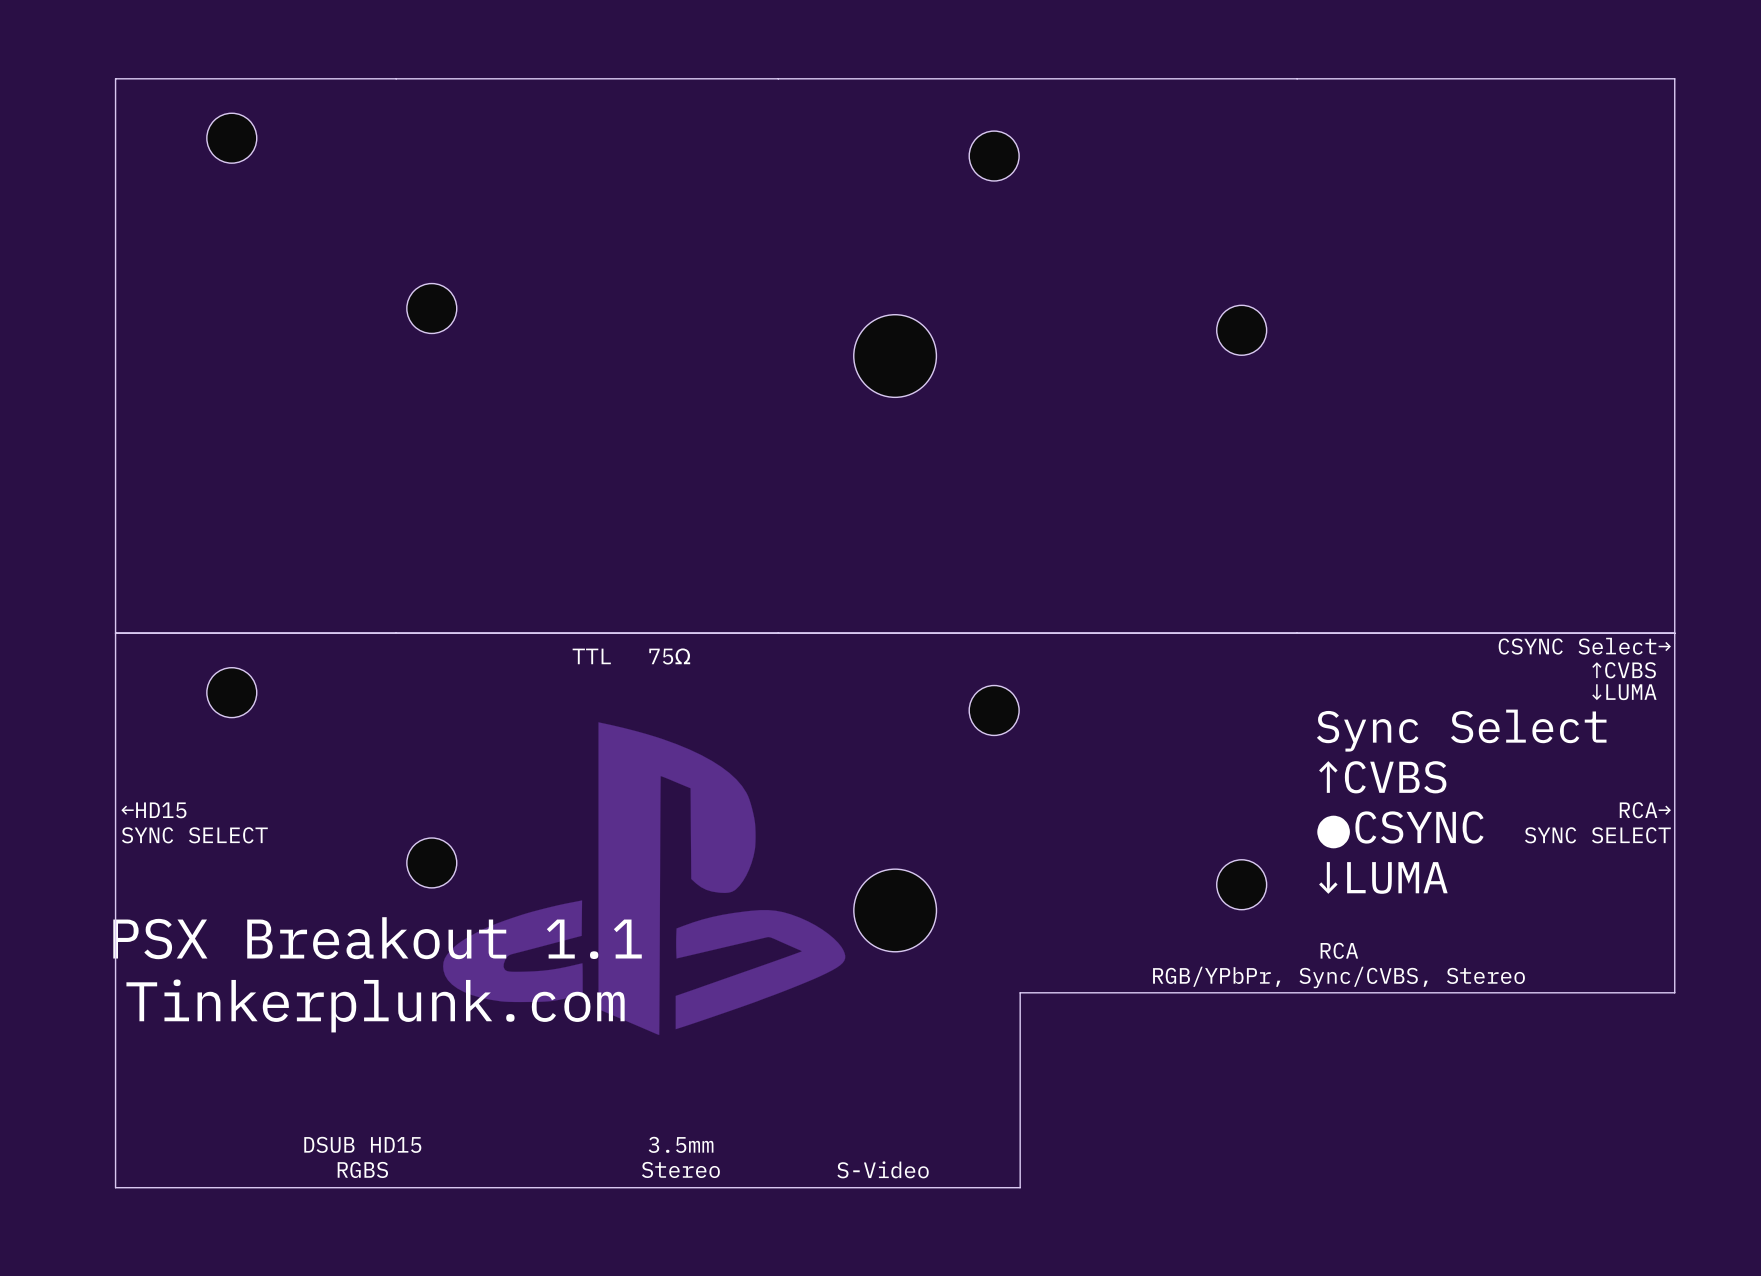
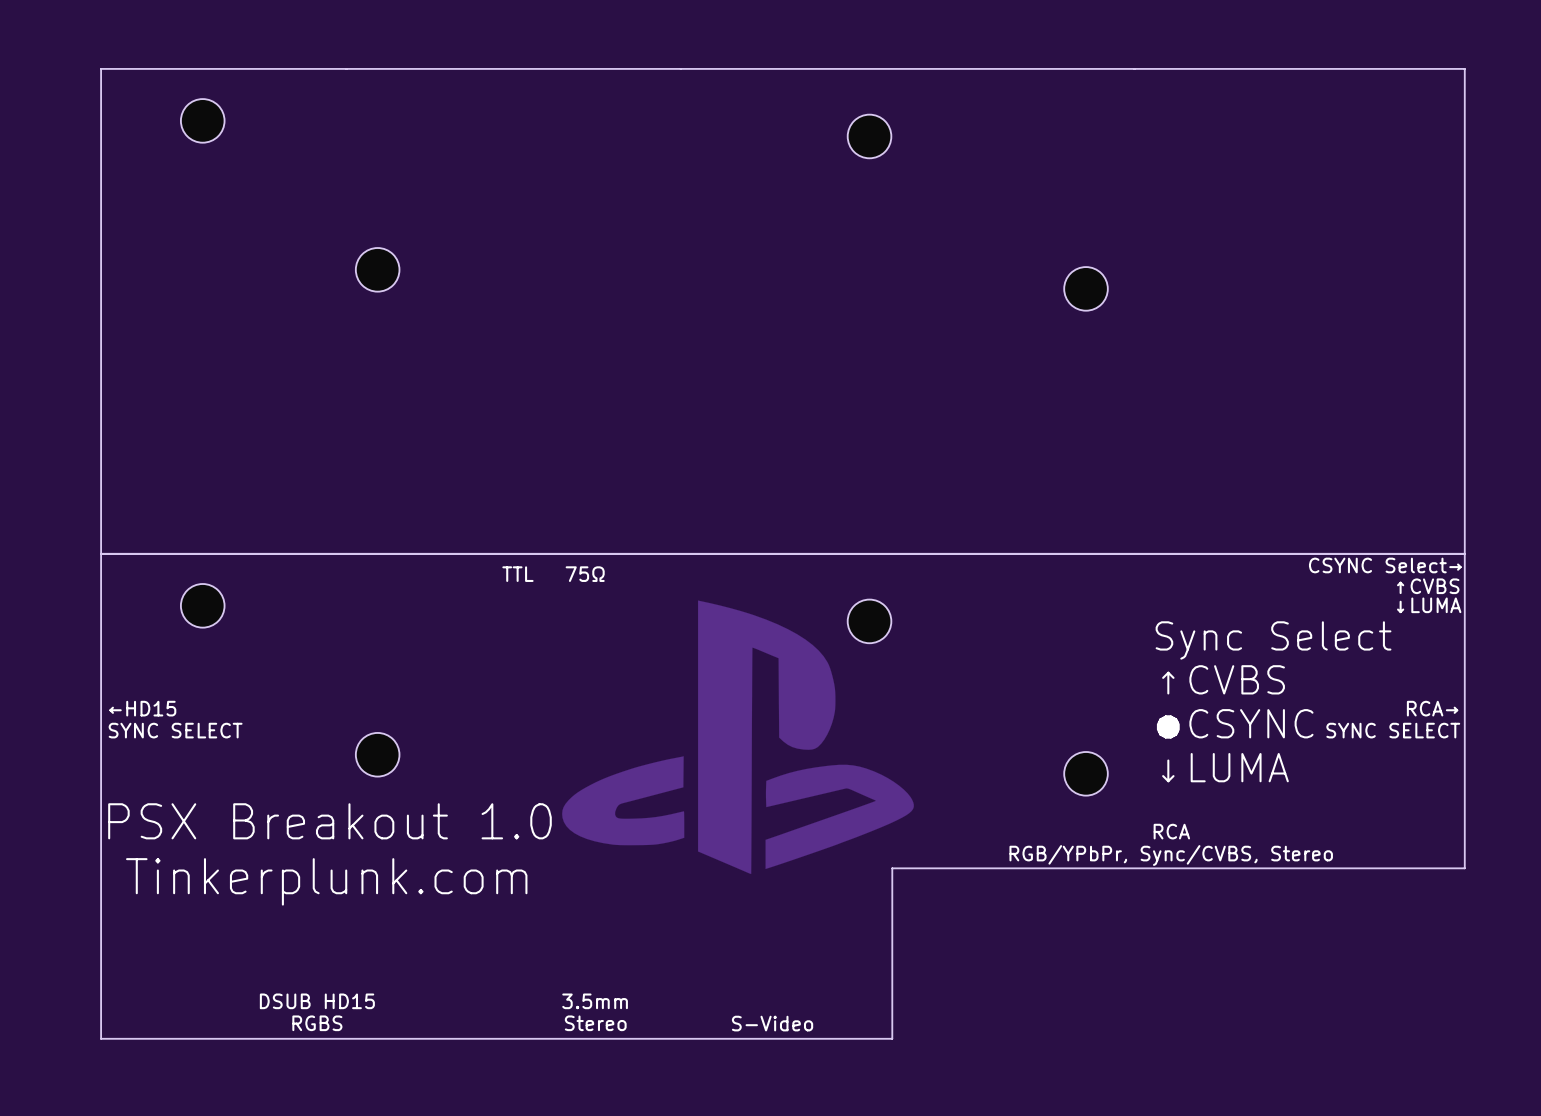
part: (895, 356) -> none
drawing position: (644, 878) -> (737, 737)
part: (895, 910) -> none
text: PSX Breakout 1.1 (377, 938) -> PSX Breakout 1.0 (329, 821)

